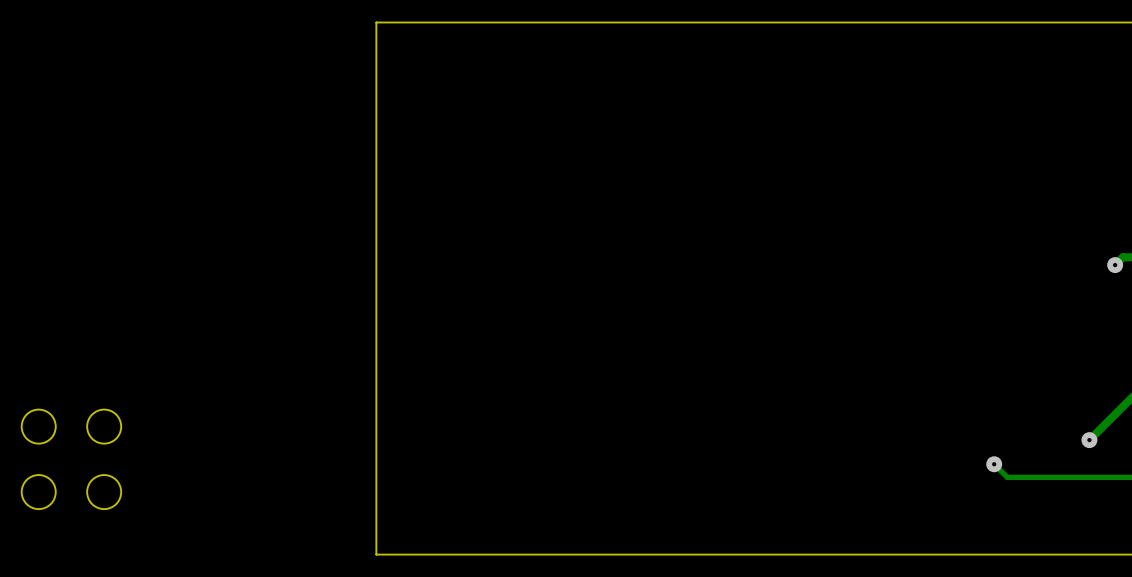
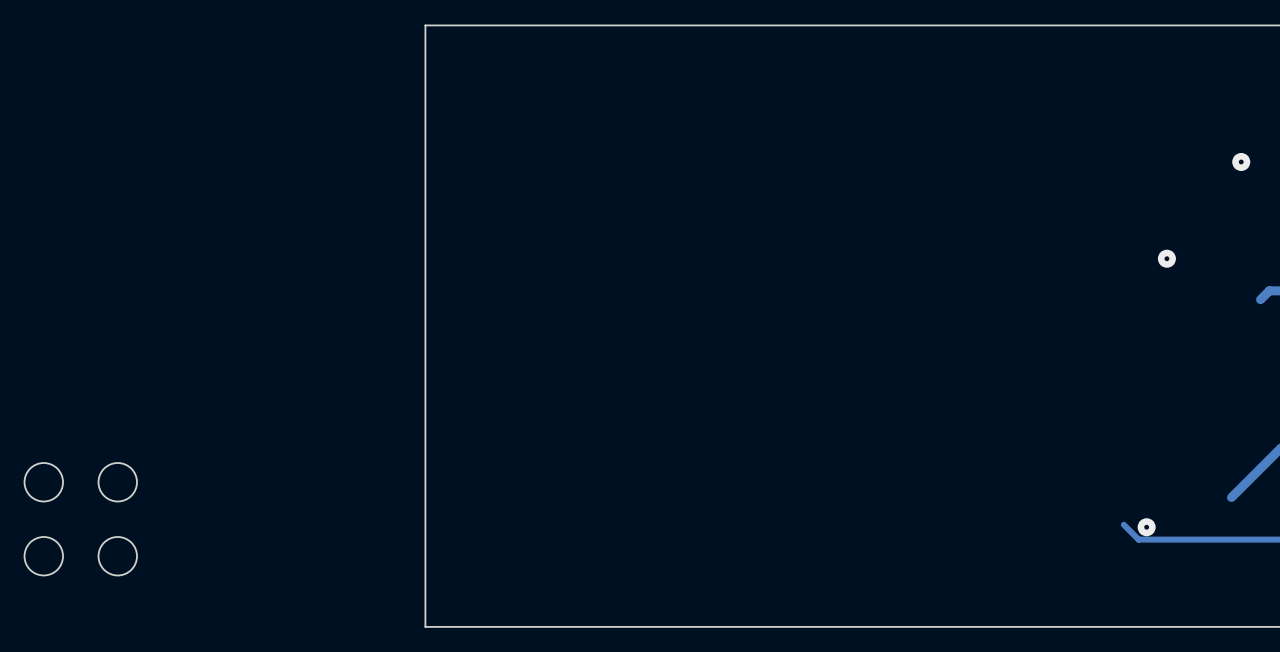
via: none -> (1241, 161)
via: none -> (1166, 258)
via: (1115, 265) -> none
via: (1089, 440) -> none
via position: (994, 464) -> (1146, 527)

